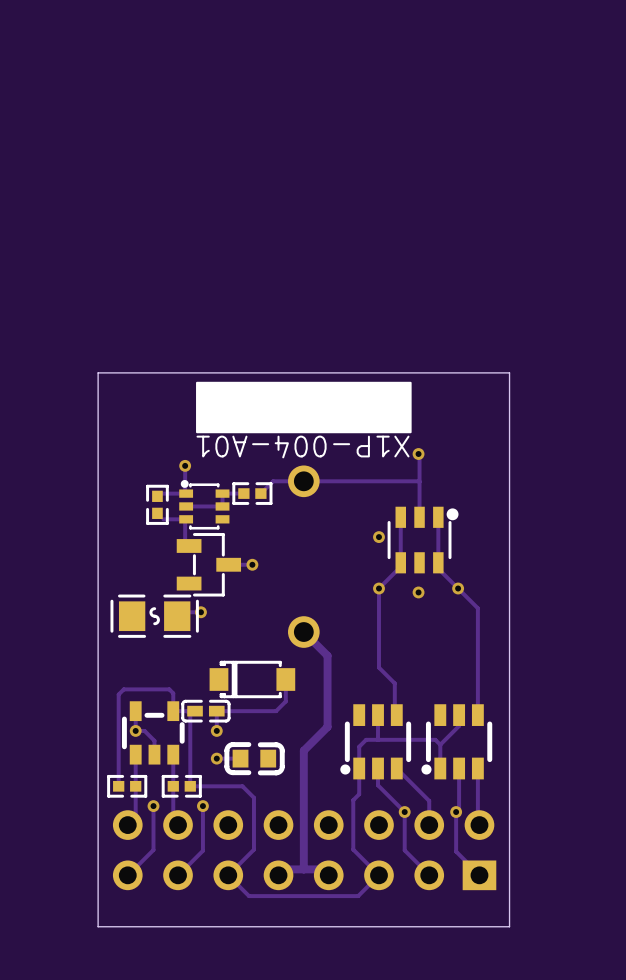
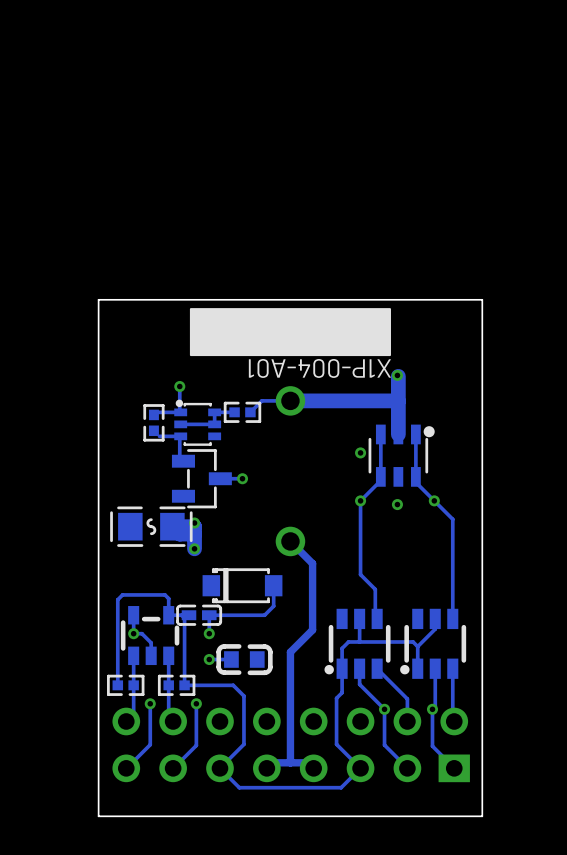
track width: thin (419, 454) (419, 517) -> thick (398, 376) (398, 434)
track width: thin (419, 481) (303, 481) -> thick (398, 400) (290, 400)
track: none -> (194, 534) (179, 534) (172, 526) (194, 526) (194, 548)
via: none -> (194, 548)

